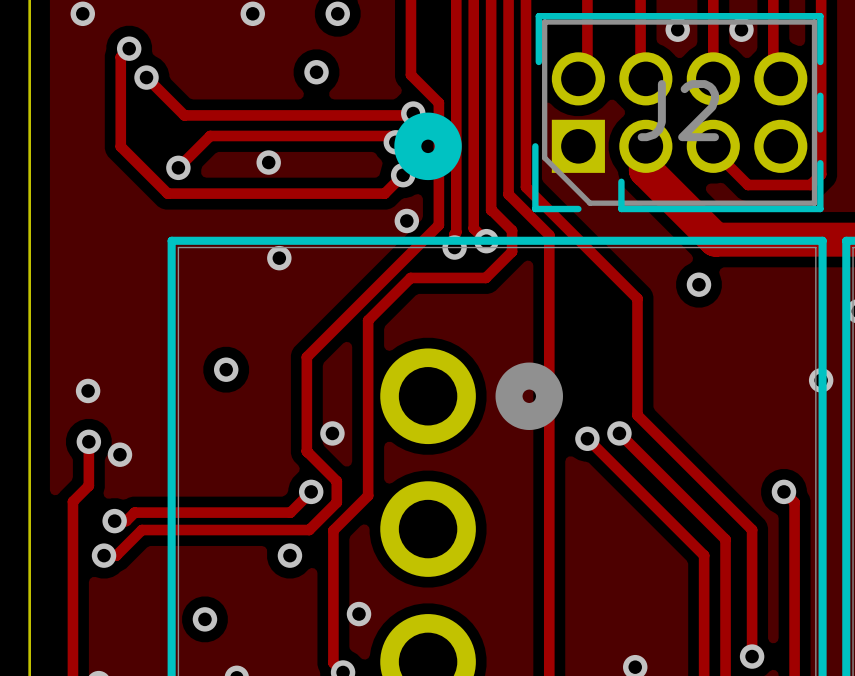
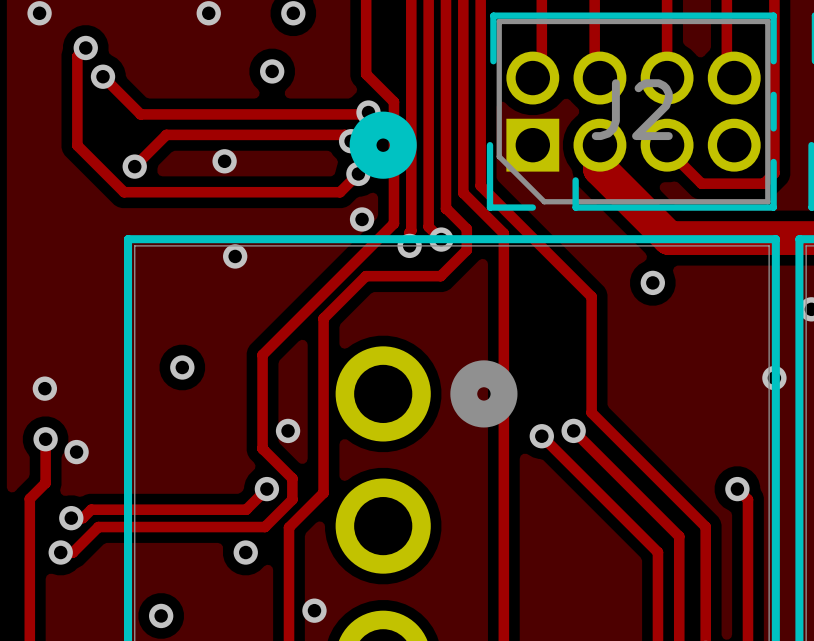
via: (677, 29) -> none
via: (741, 29) -> none

